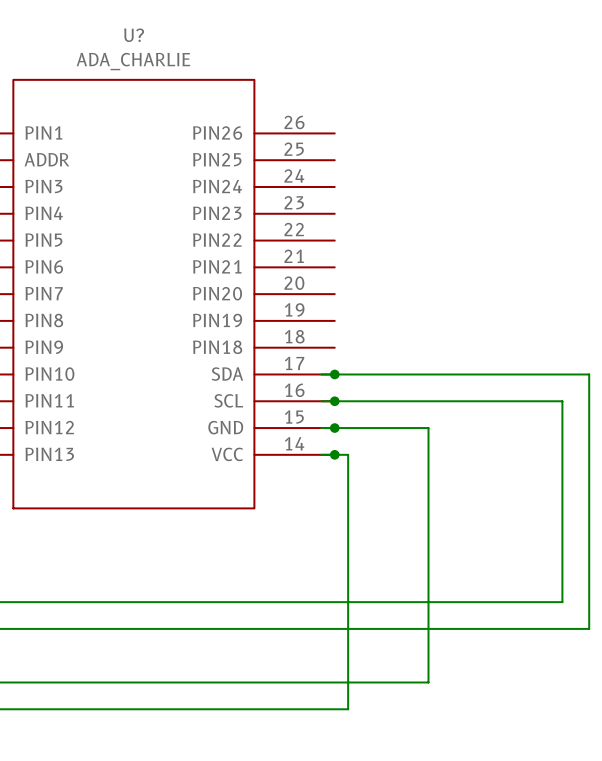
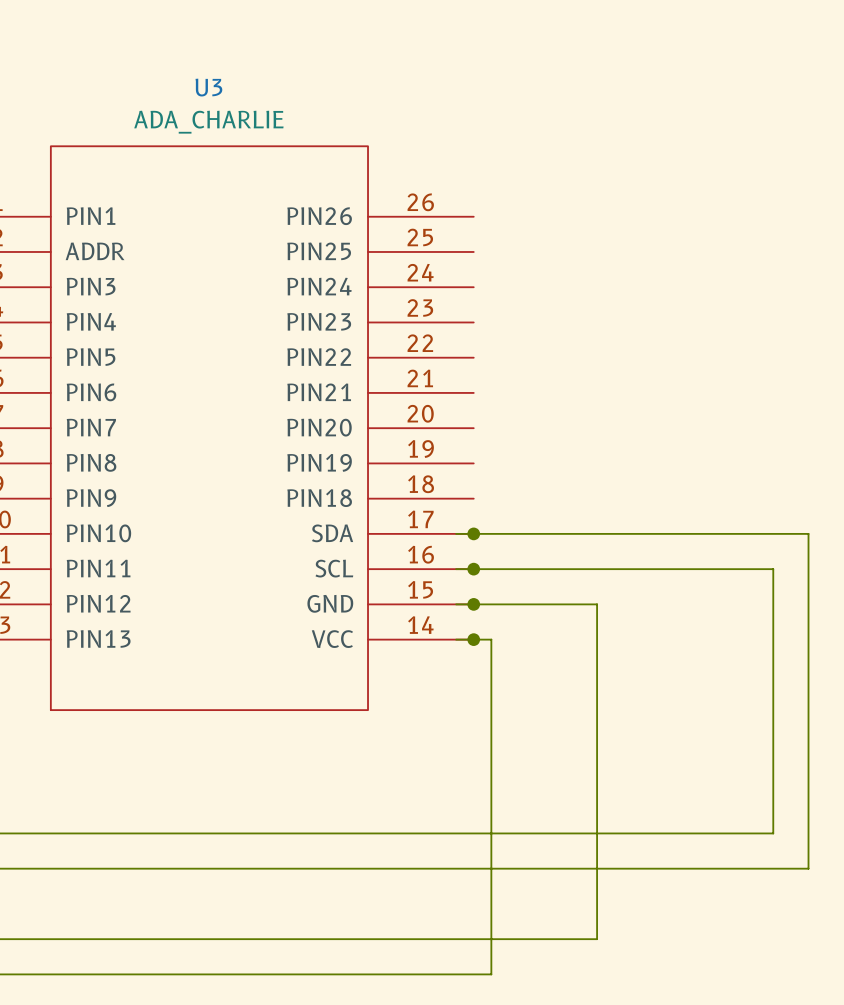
U? name: U? (134, 35) -> U3 (208, 87)

